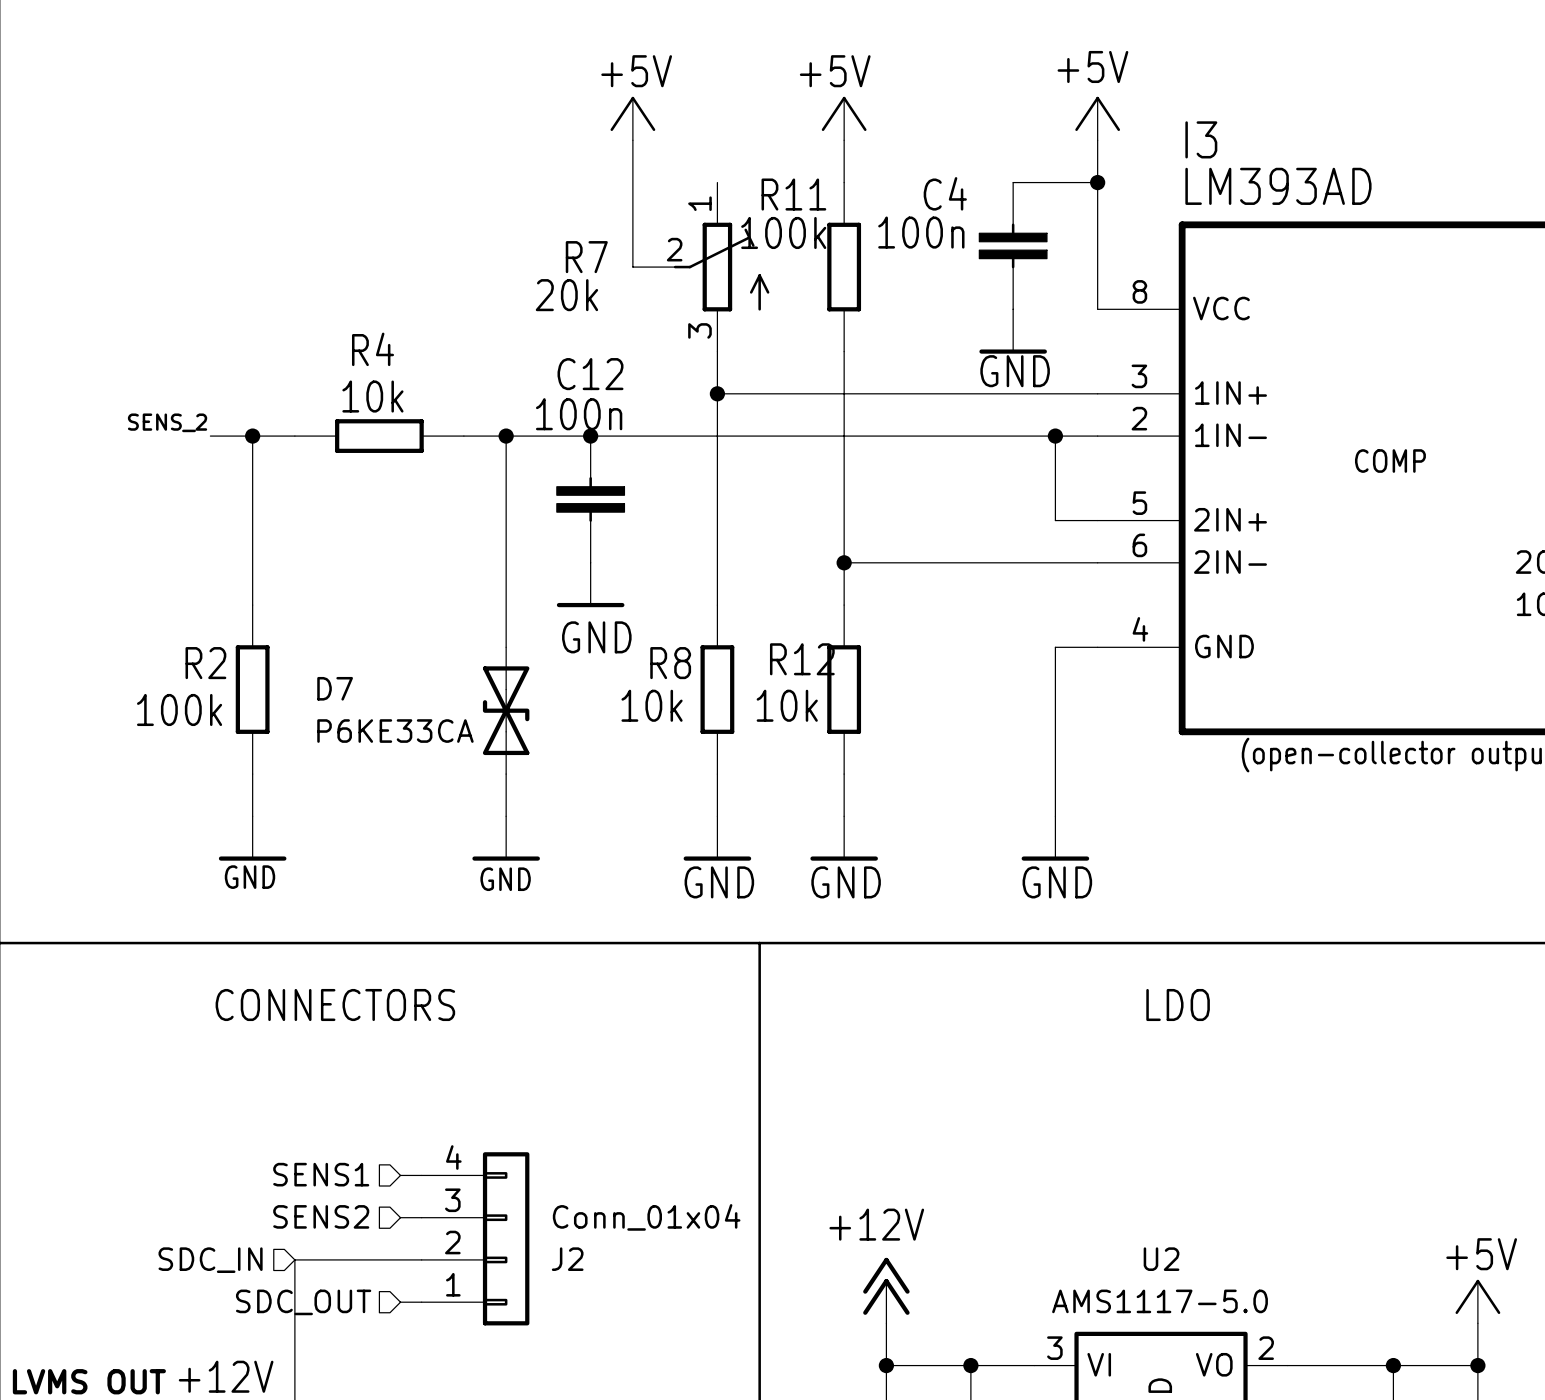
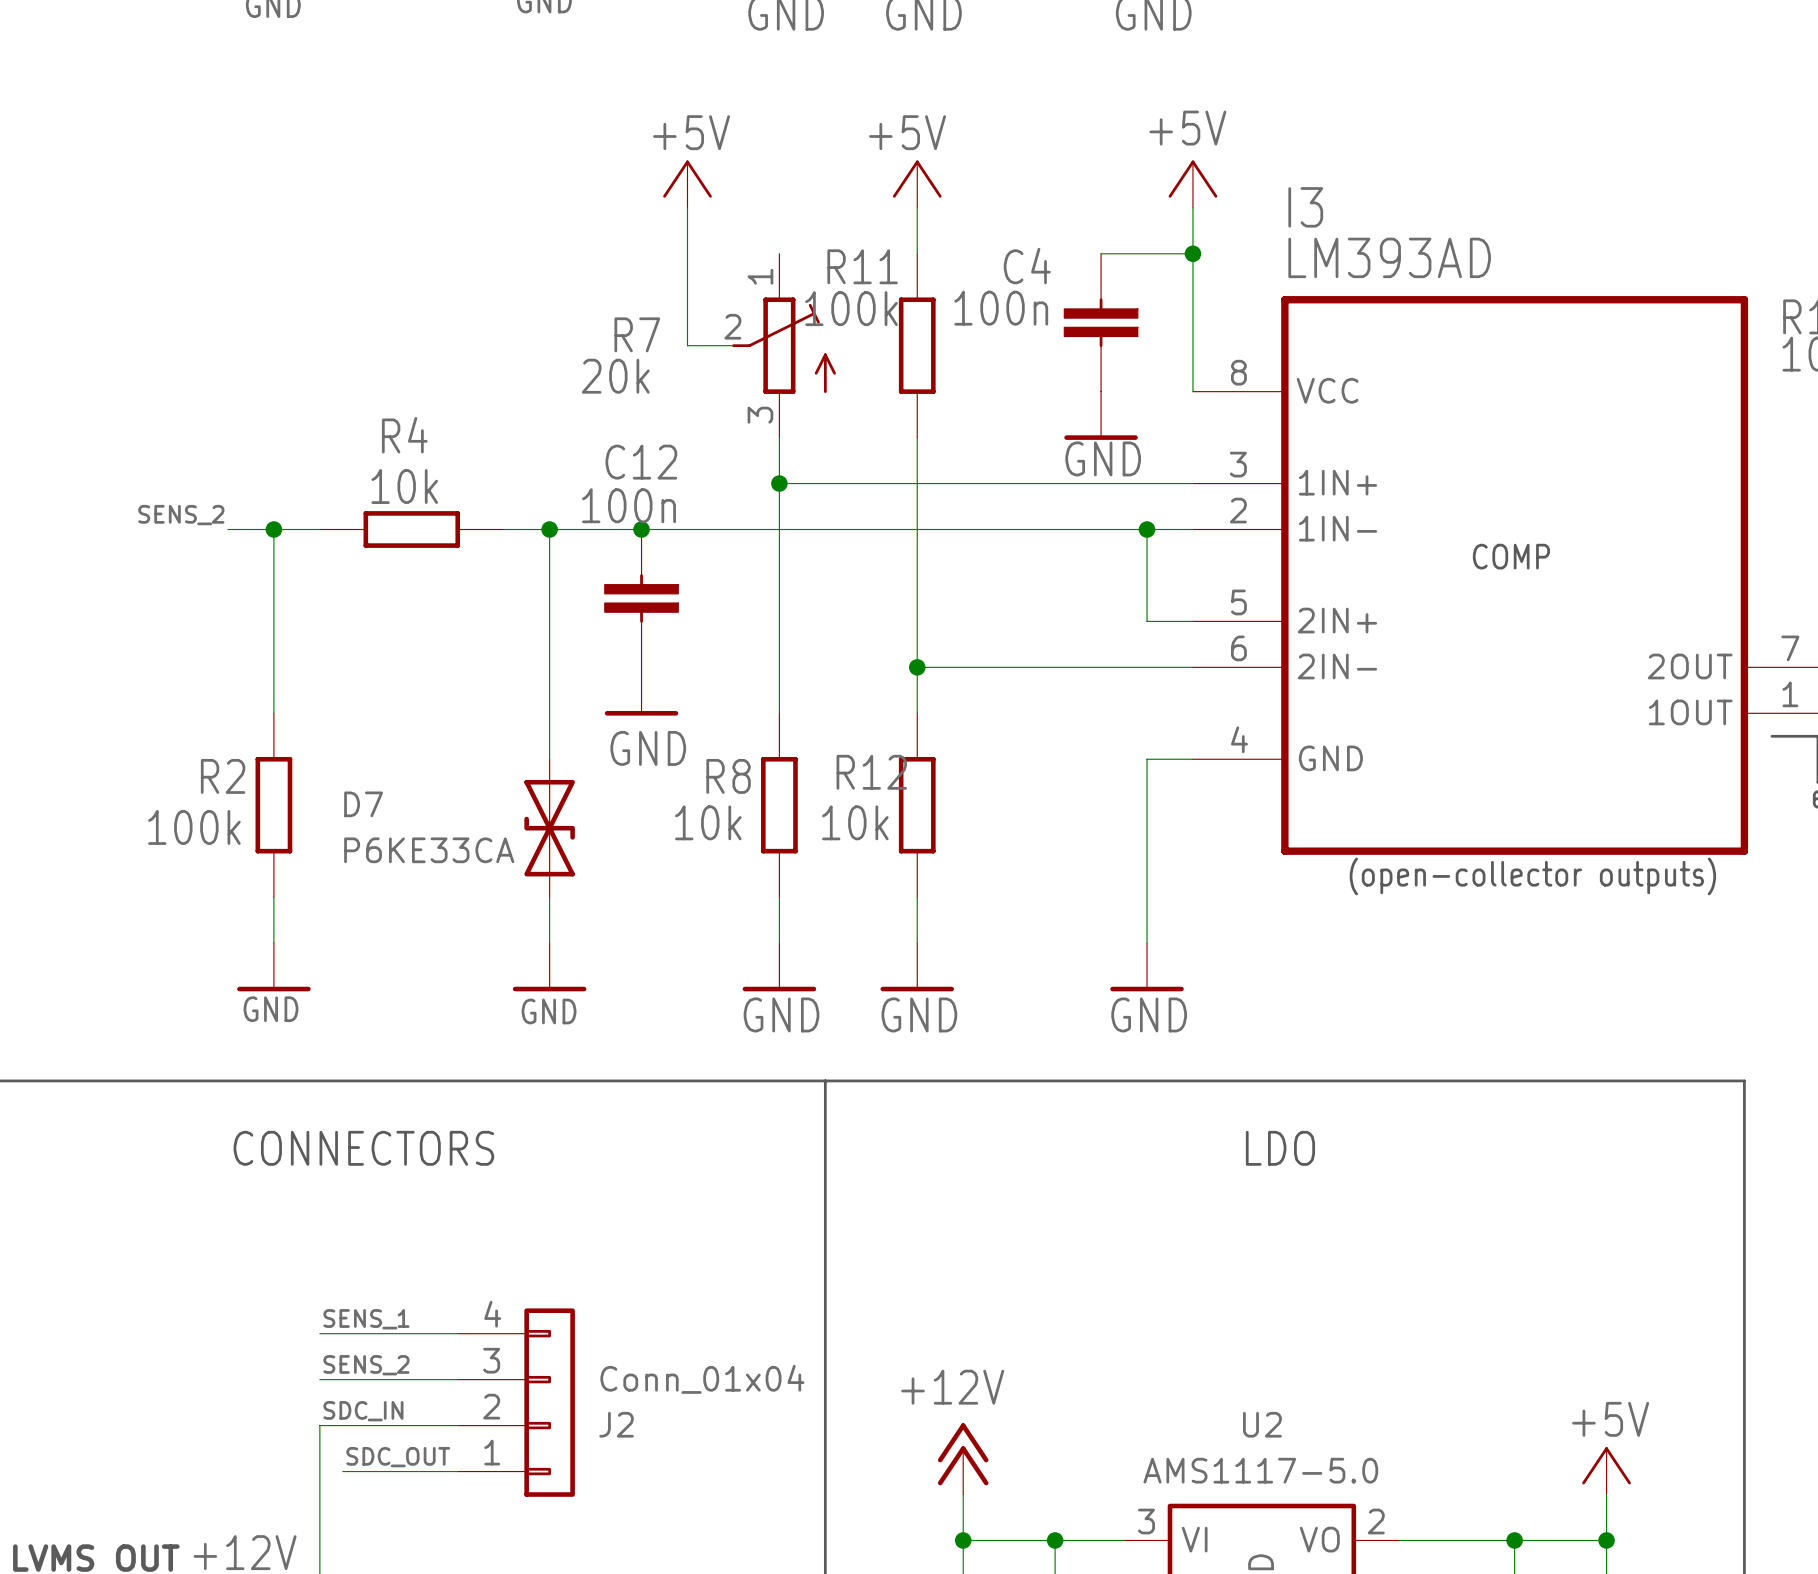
label: none -> SENS_1 (366, 1319)
hierarchical label: SENS1 (321, 1174) -> none
wire: none -> (319, 1333) (434, 1333)
label: none -> SENS_2 (366, 1365)
hierarchical label: SENS2 (321, 1216) -> none
wire: none -> (319, 1379) (434, 1379)
label: none -> SDC_IN (363, 1411)
hierarchical label: SDC_IN (210, 1260) -> none
label: none -> SDC_OUT (398, 1457)
hierarchical label: SDC_OUT (303, 1302) -> none
wire: none -> (342, 1471) (434, 1471)

